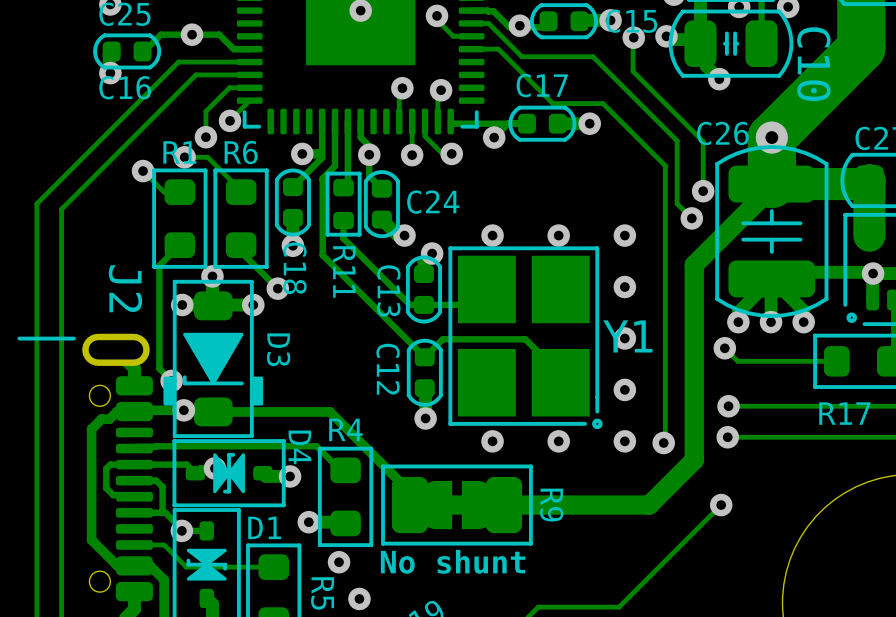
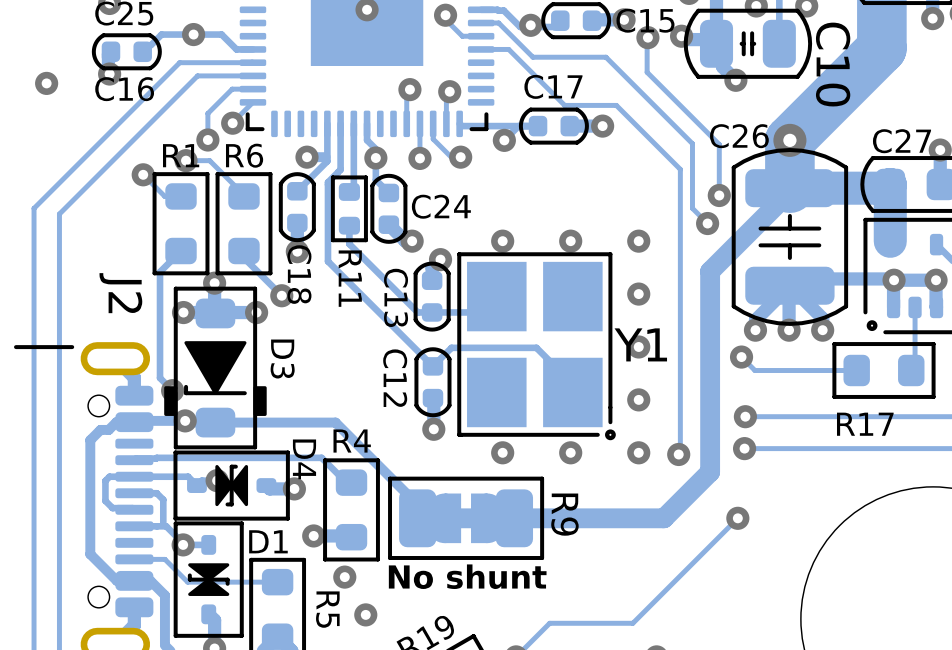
via: none -> (46, 83)
R9 footprint: [381, 464, 533, 546] -> [388, 476, 545, 560]

